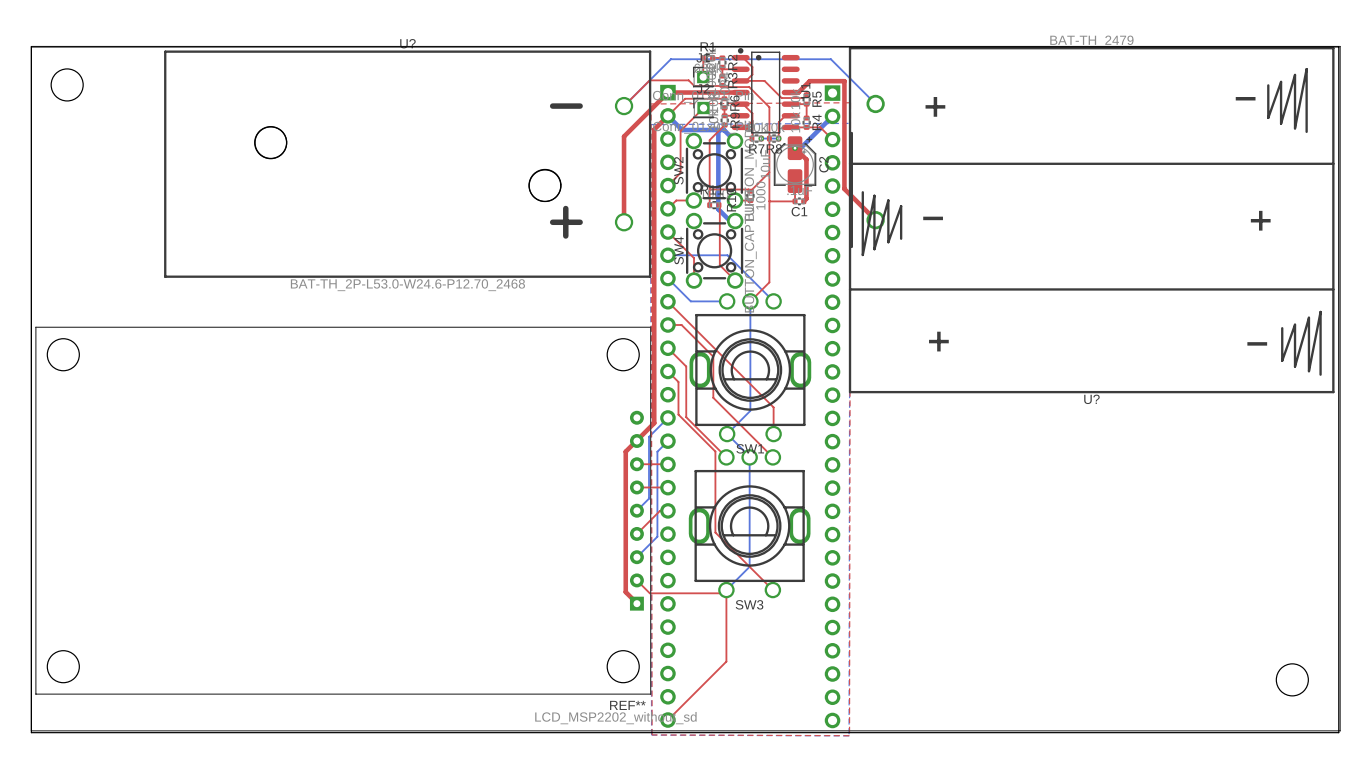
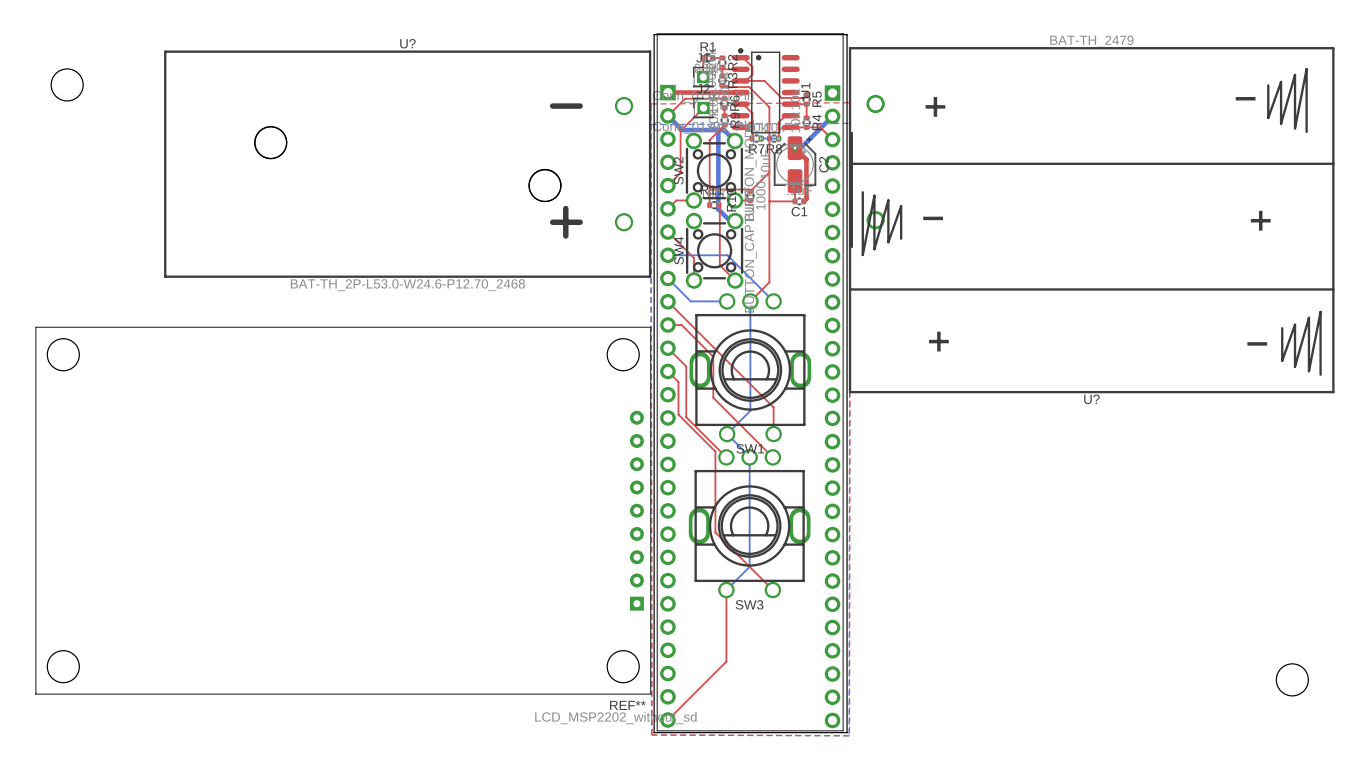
top track: (721, 85) (694, 85) (688, 80) (649, 80) (624, 106) -> none
top track: (667, 92) (624, 136) (624, 222) -> none
top track: (790, 92) (798, 92) (809, 81) (844, 81) (844, 188) (875, 220) -> none
bottom track: (875, 103) (830, 59) (670, 59) (624, 106) -> none
top track: (667, 115) (654, 129) (654, 423) (625, 451) (625, 592) (636, 603) -> none
bottom track: (667, 417) (649, 436) (649, 498) (636, 510) -> none
bottom track: (667, 441) (657, 451) (657, 536) (636, 557) -> none
top track: (636, 464) (667, 464) -> none
top track: (636, 487) (667, 487) -> none
top track: (667, 510) (659, 510) (636, 533) -> none
top track: (636, 580) (649, 593) (723, 593) (726, 590) -> none
line: (657, 730) (31, 730) (31, 46) (1340, 46) (1340, 730) (843, 730) -> (657, 730) (657, 33) (843, 33) (843, 730)
board edge: (654, 732) (31, 732) (31, 46) (1338, 46) (1338, 732) (847, 732) -> (654, 732) (654, 34) (847, 34) (847, 732)

